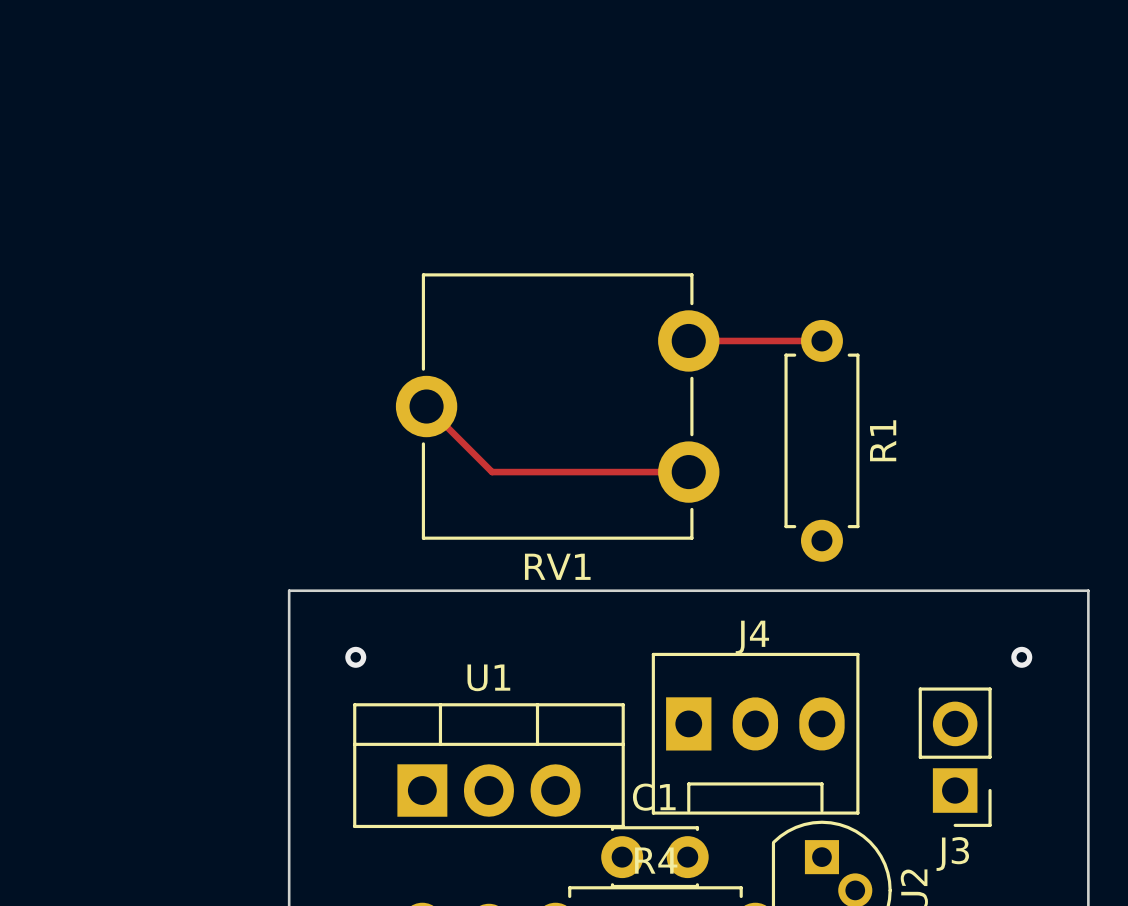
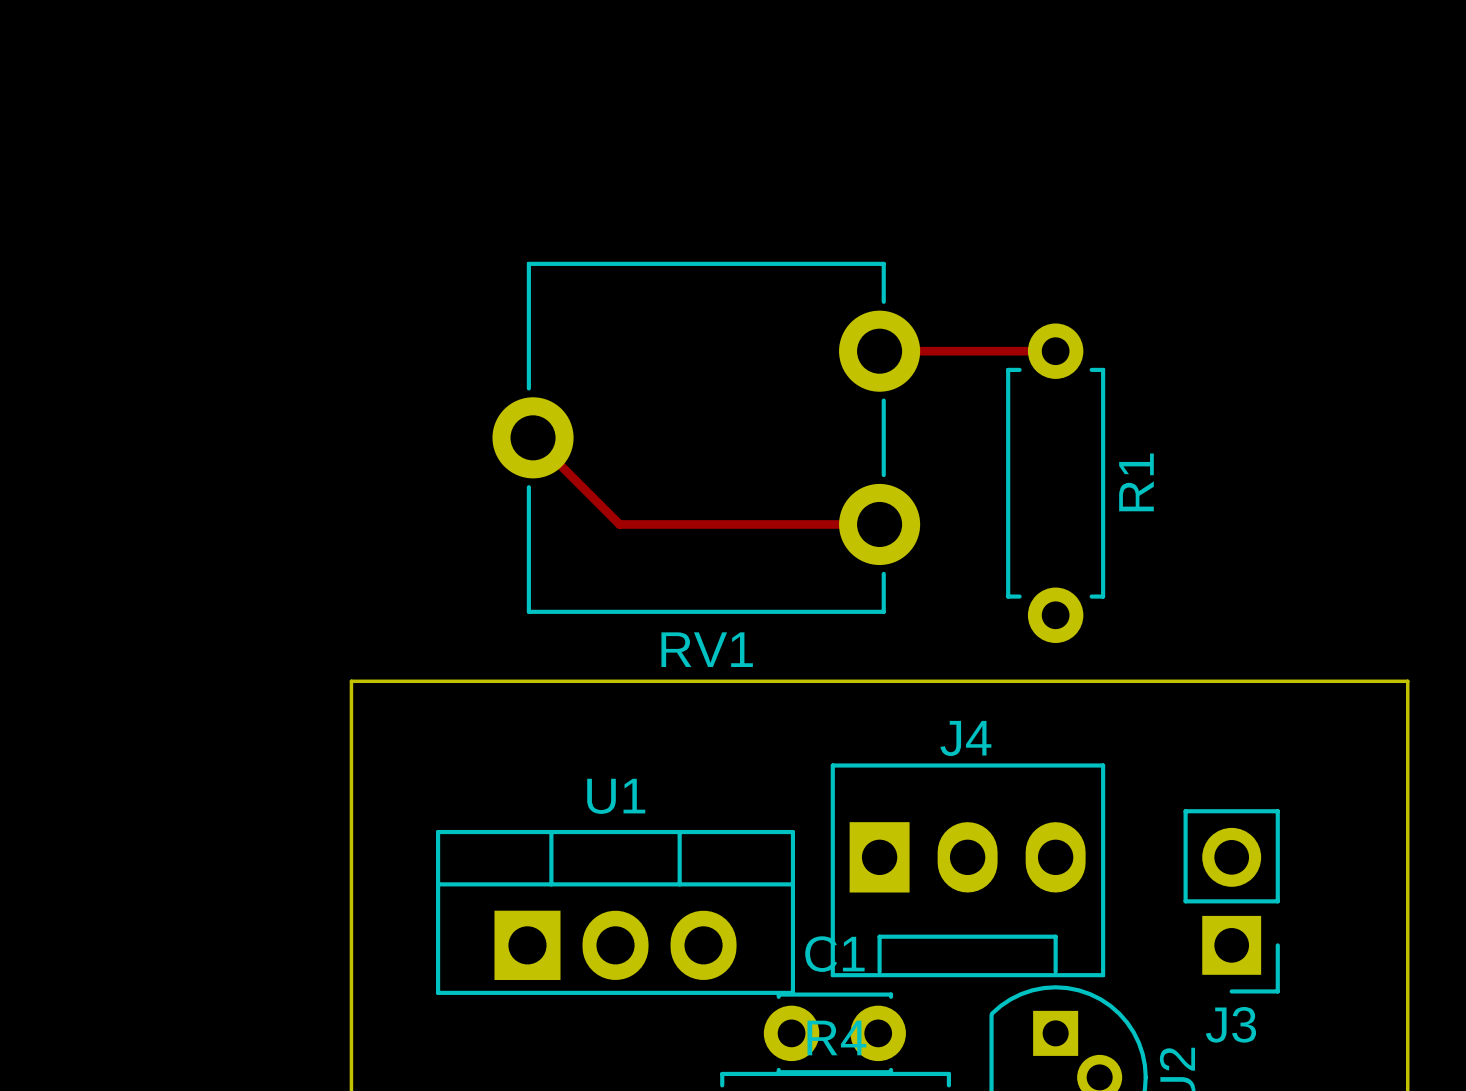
via: (355, 657) -> none
via: (1021, 657) -> none

